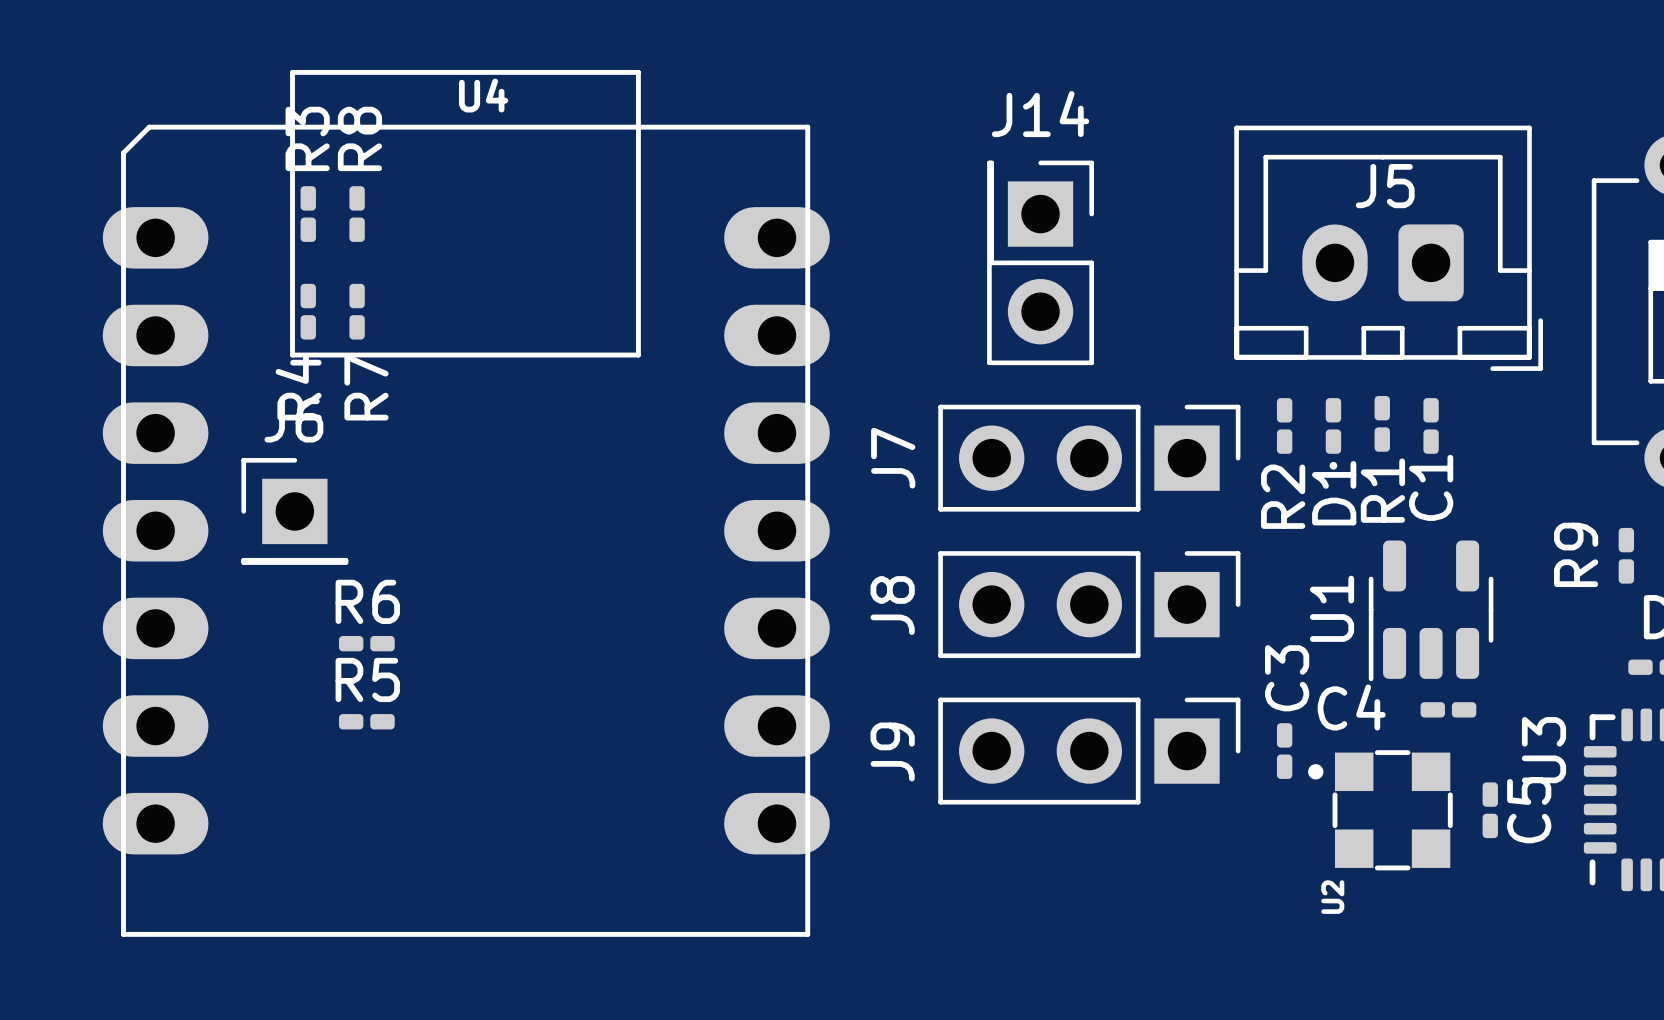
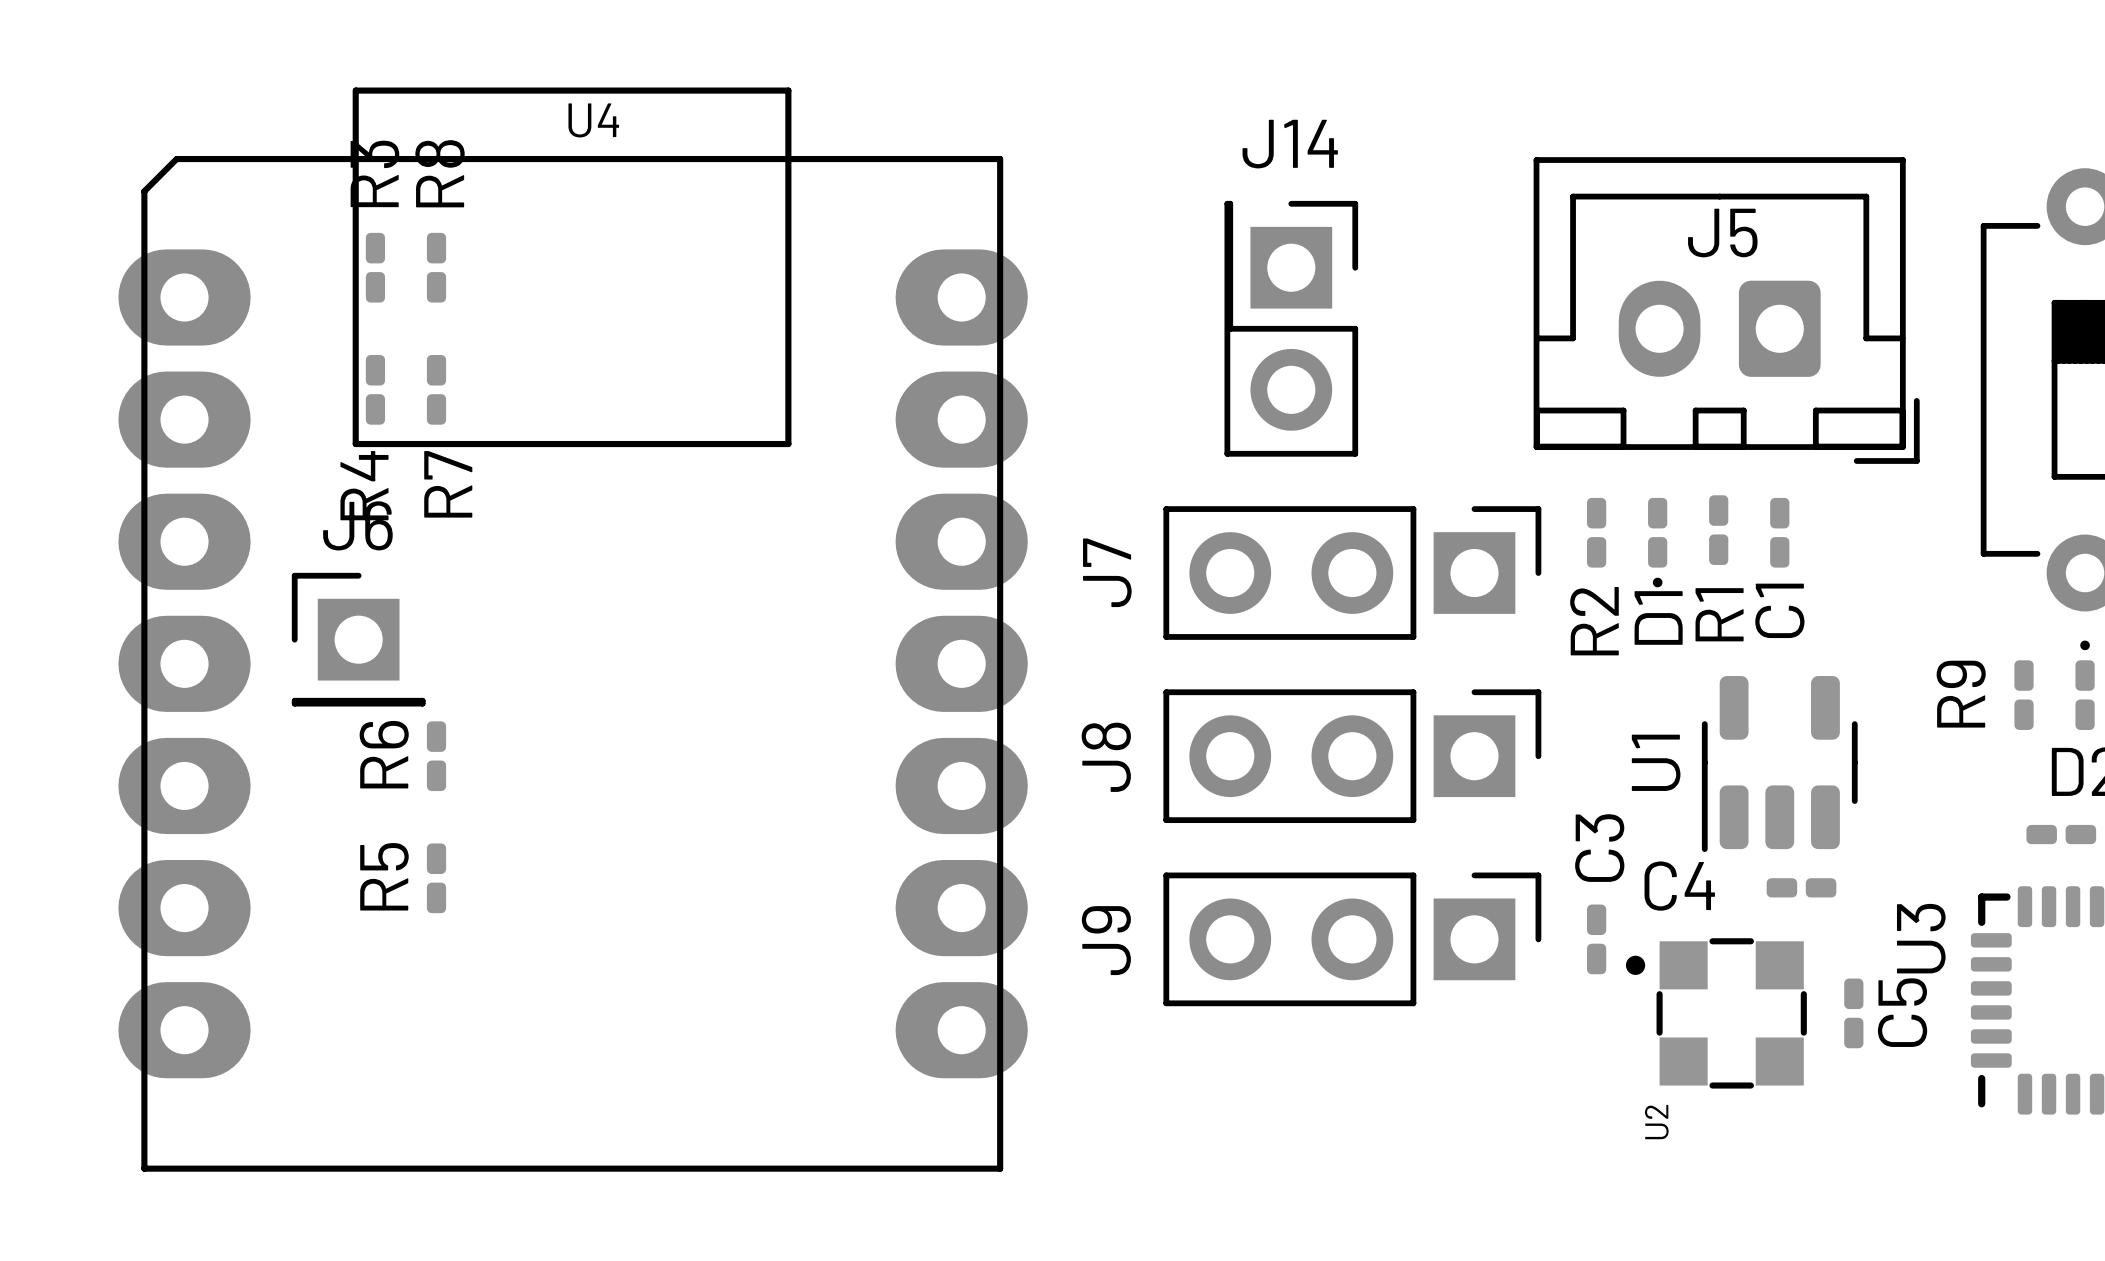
U4 footprint: [102, 69, 830, 937] -> [118, 87, 1028, 1172]
R6 rotation: 0° (366, 643) -> 90° clockwise (436, 756)
R6 position: (366, 643) -> (436, 756)
R5 rotation: 0° (366, 721) -> 90° clockwise (436, 878)

